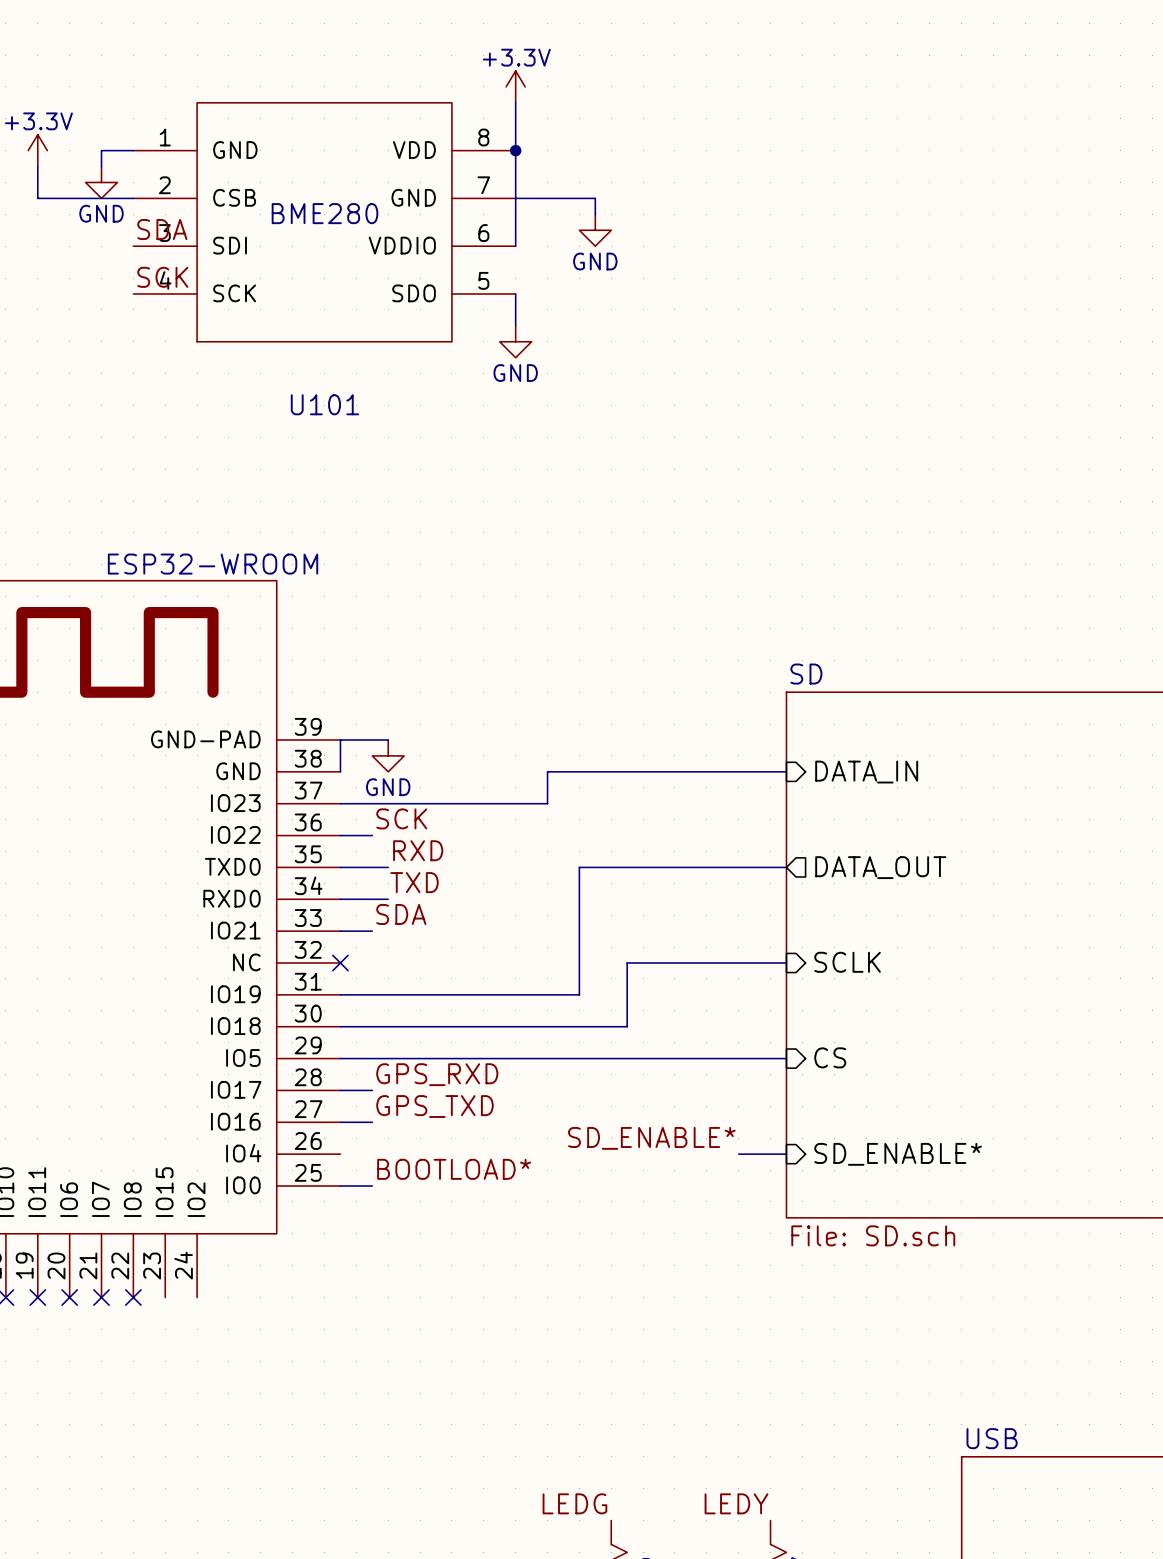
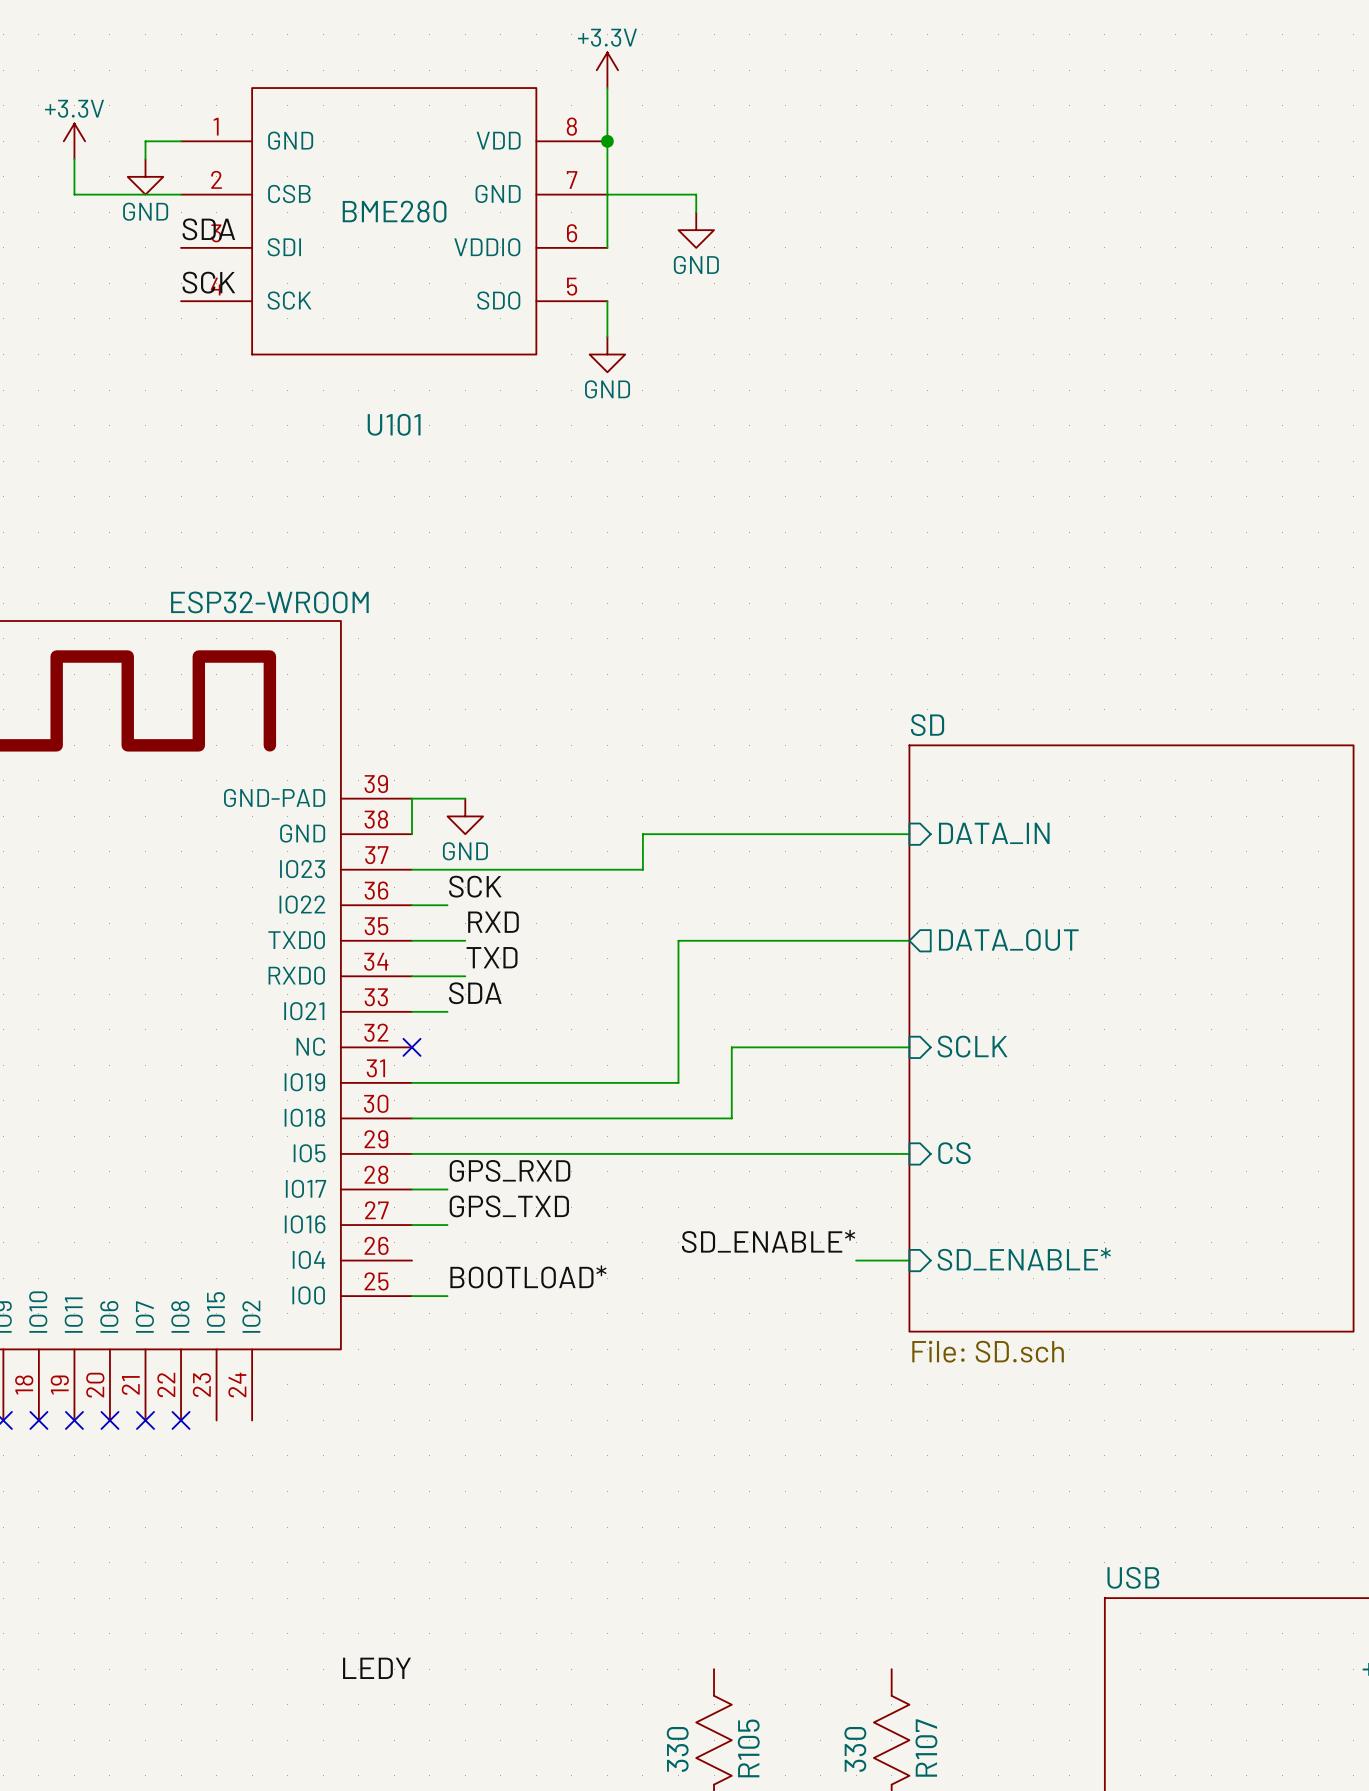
label: LEDG (574, 1503) -> none
label: LEDY (736, 1503) -> none
label: none -> LEDY (376, 1668)

